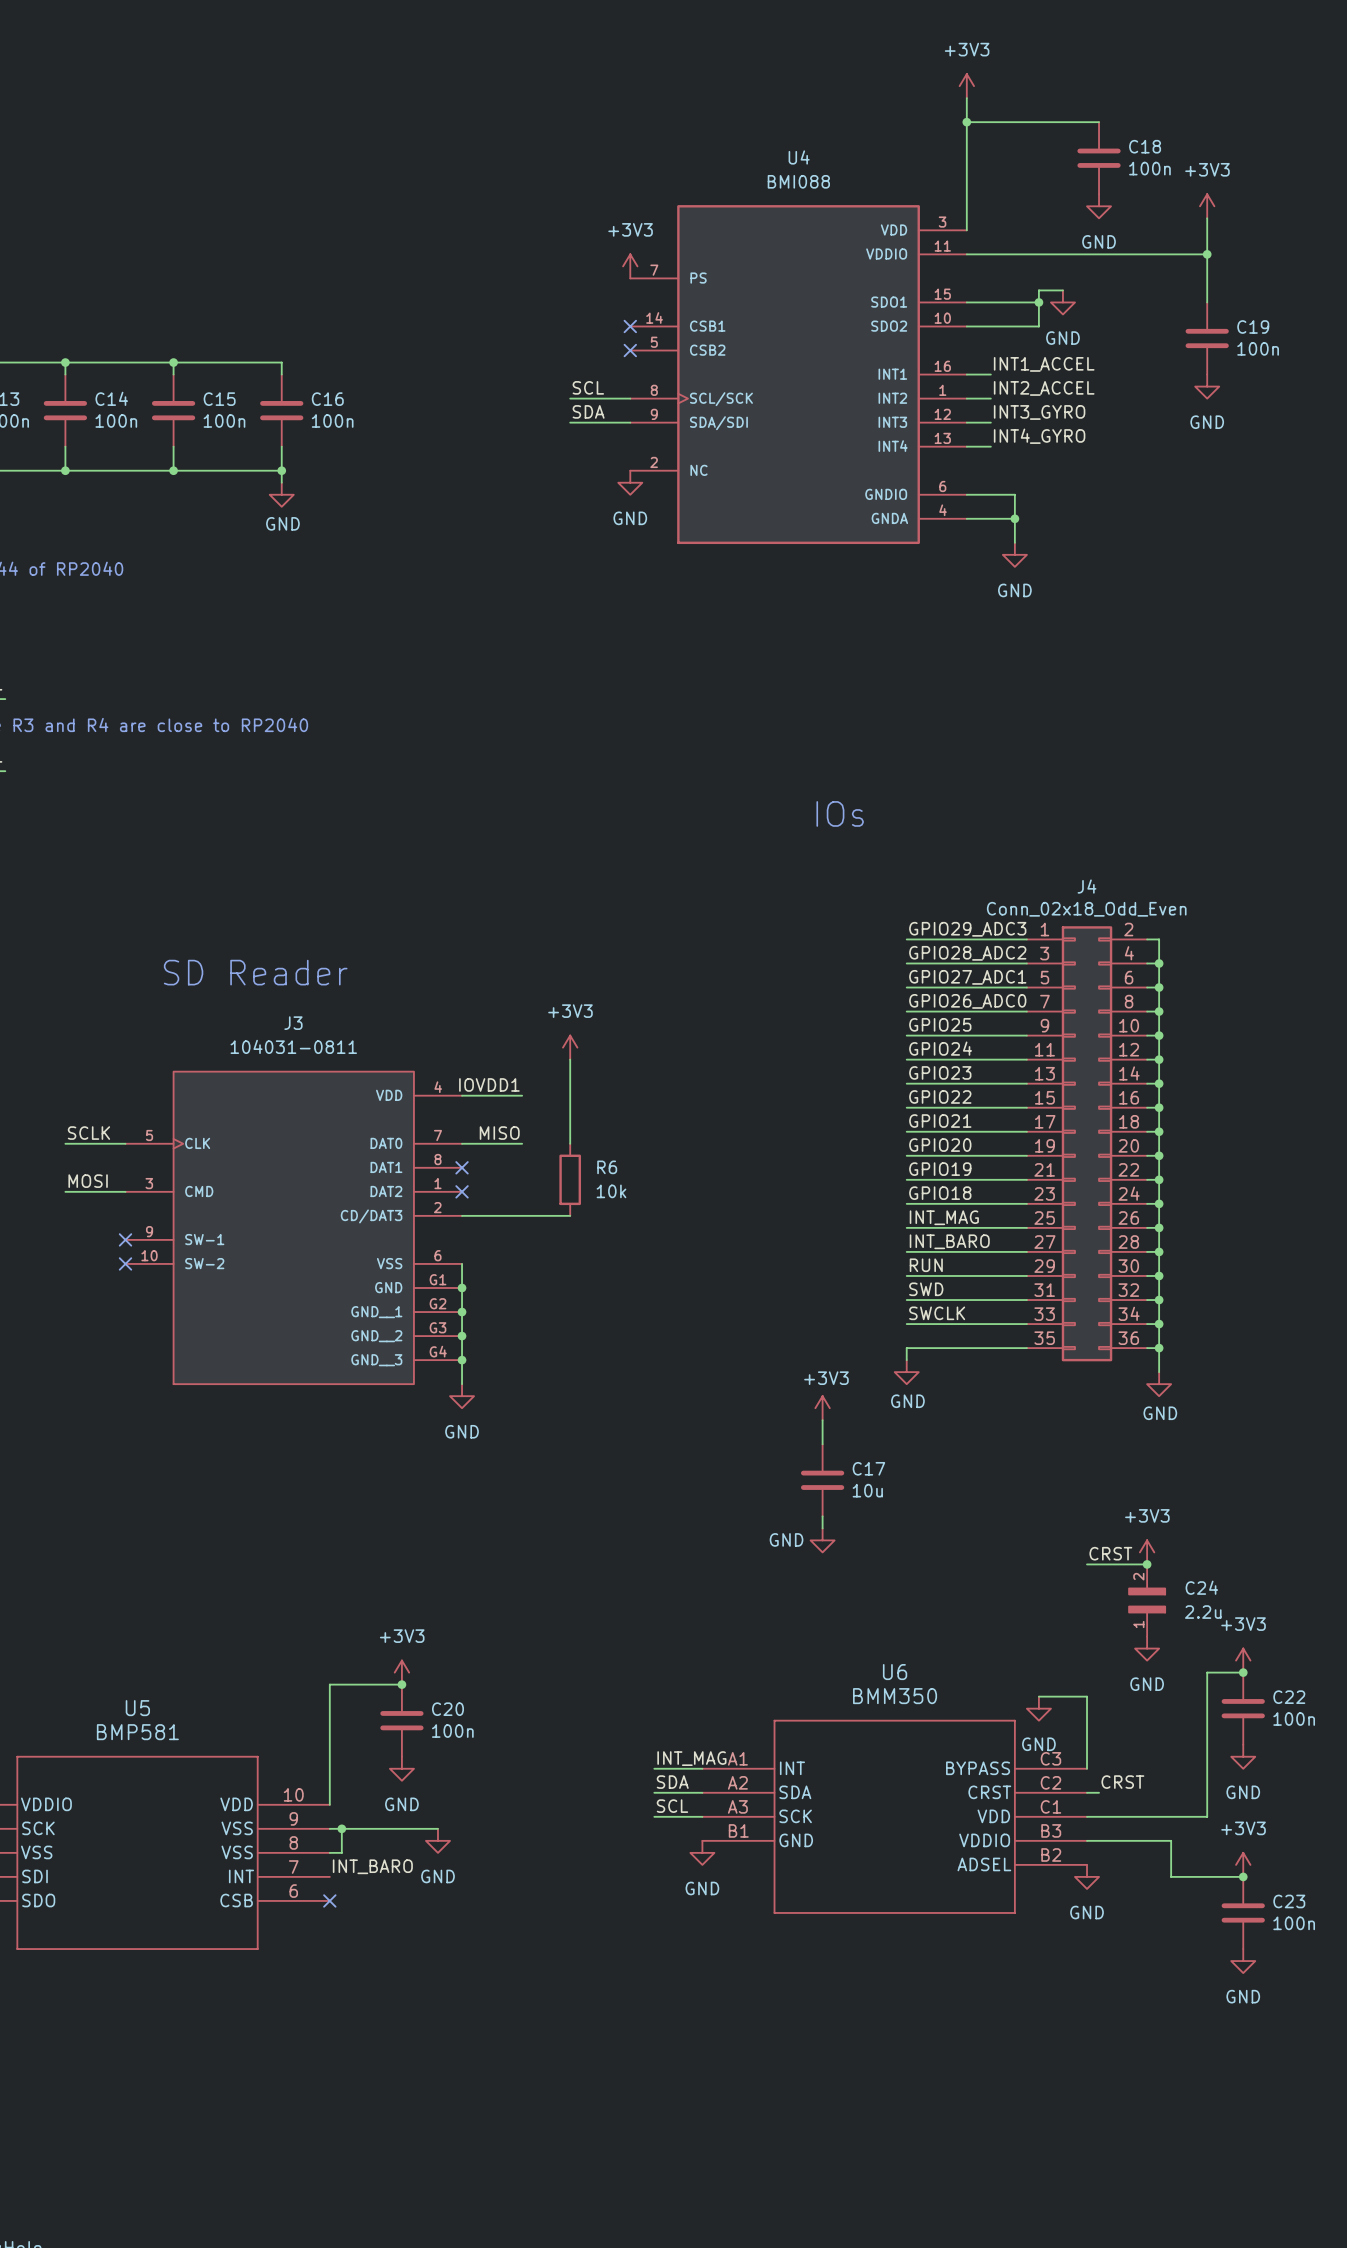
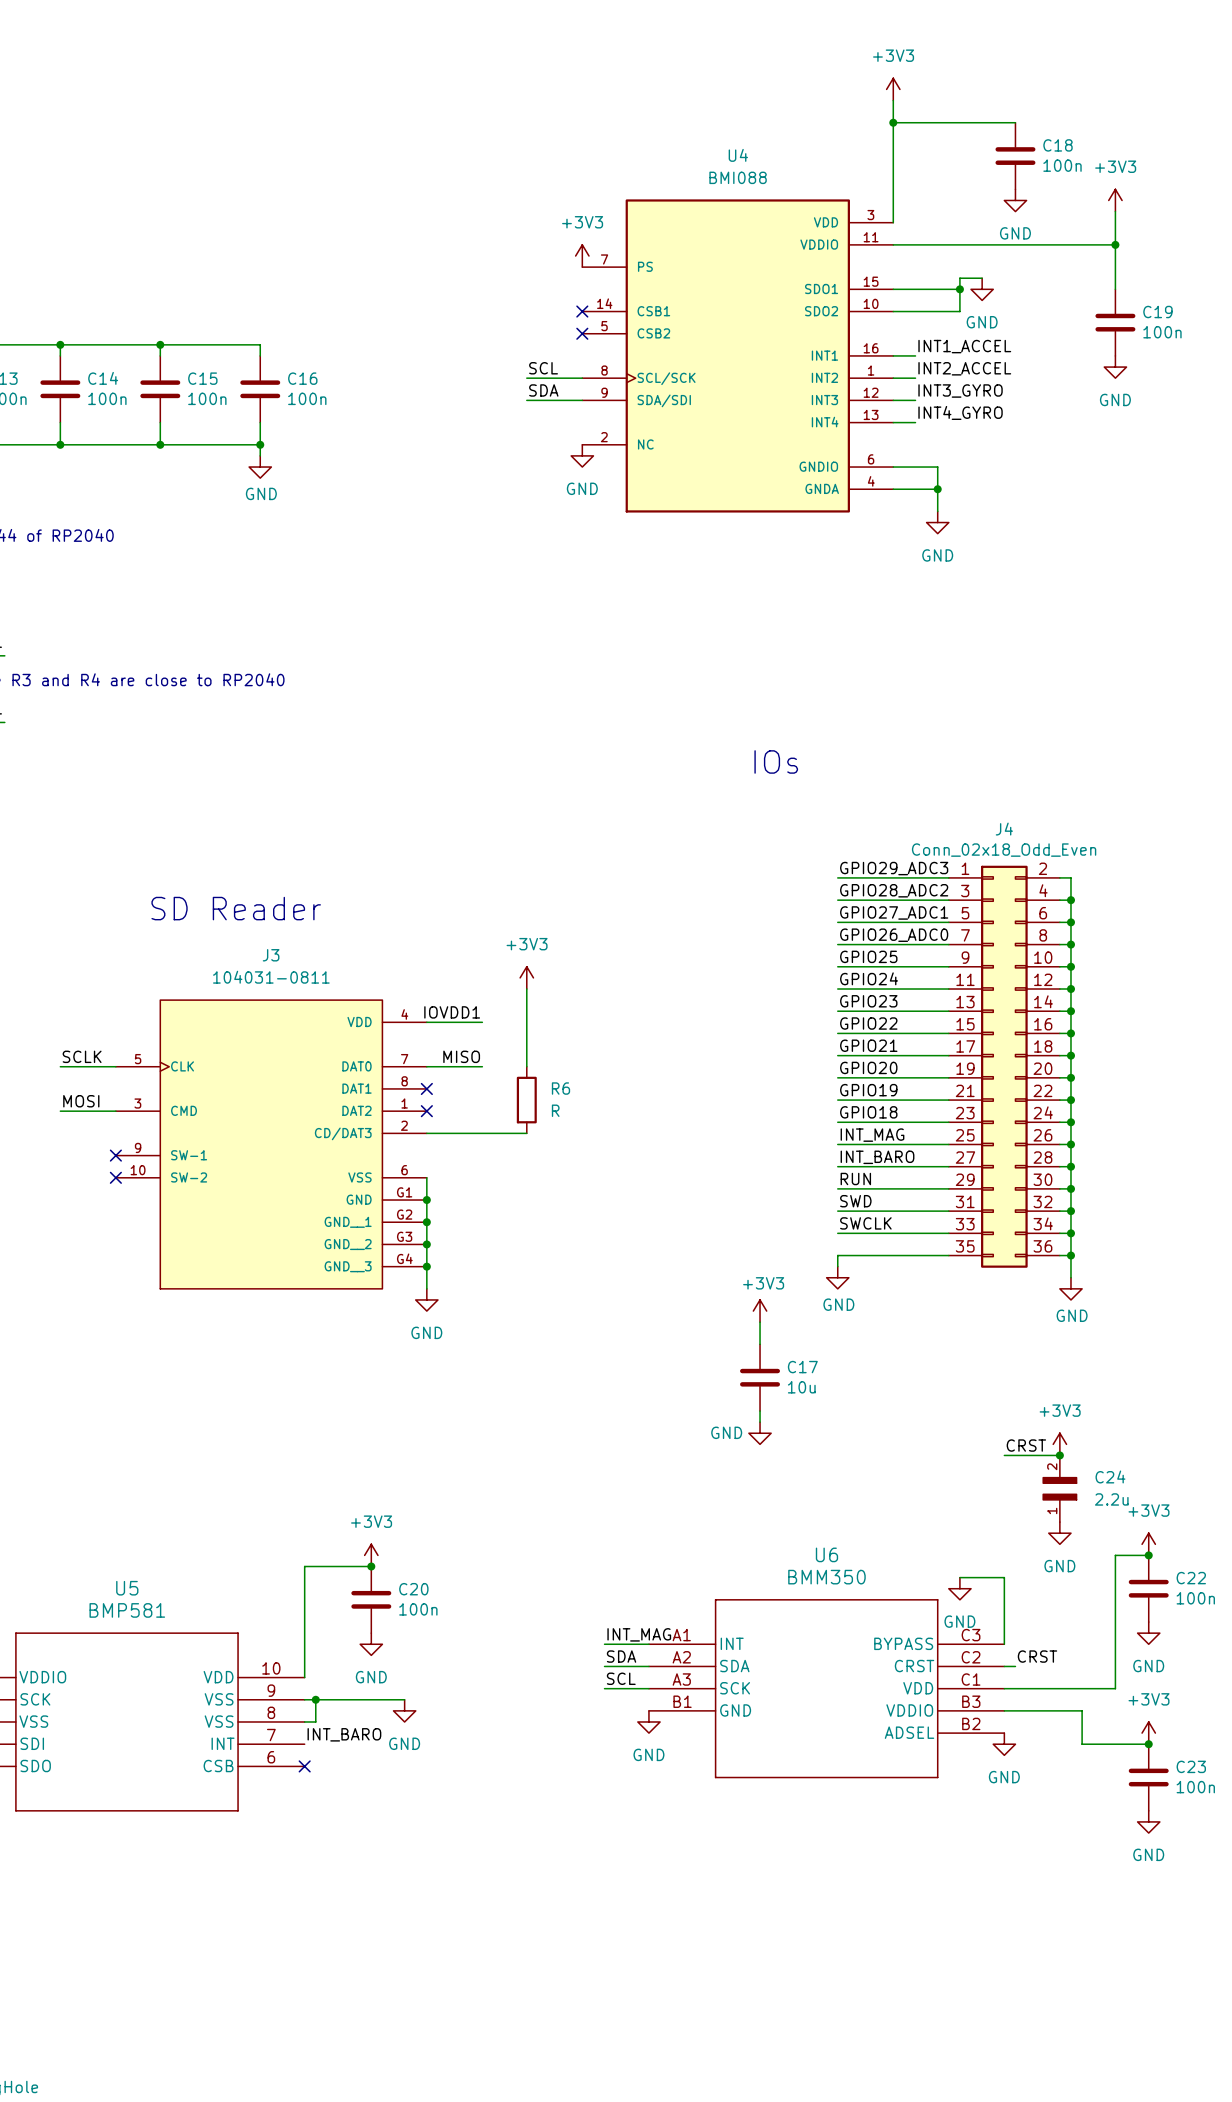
R6 value: 10k (611, 1191) -> R (555, 1110)

